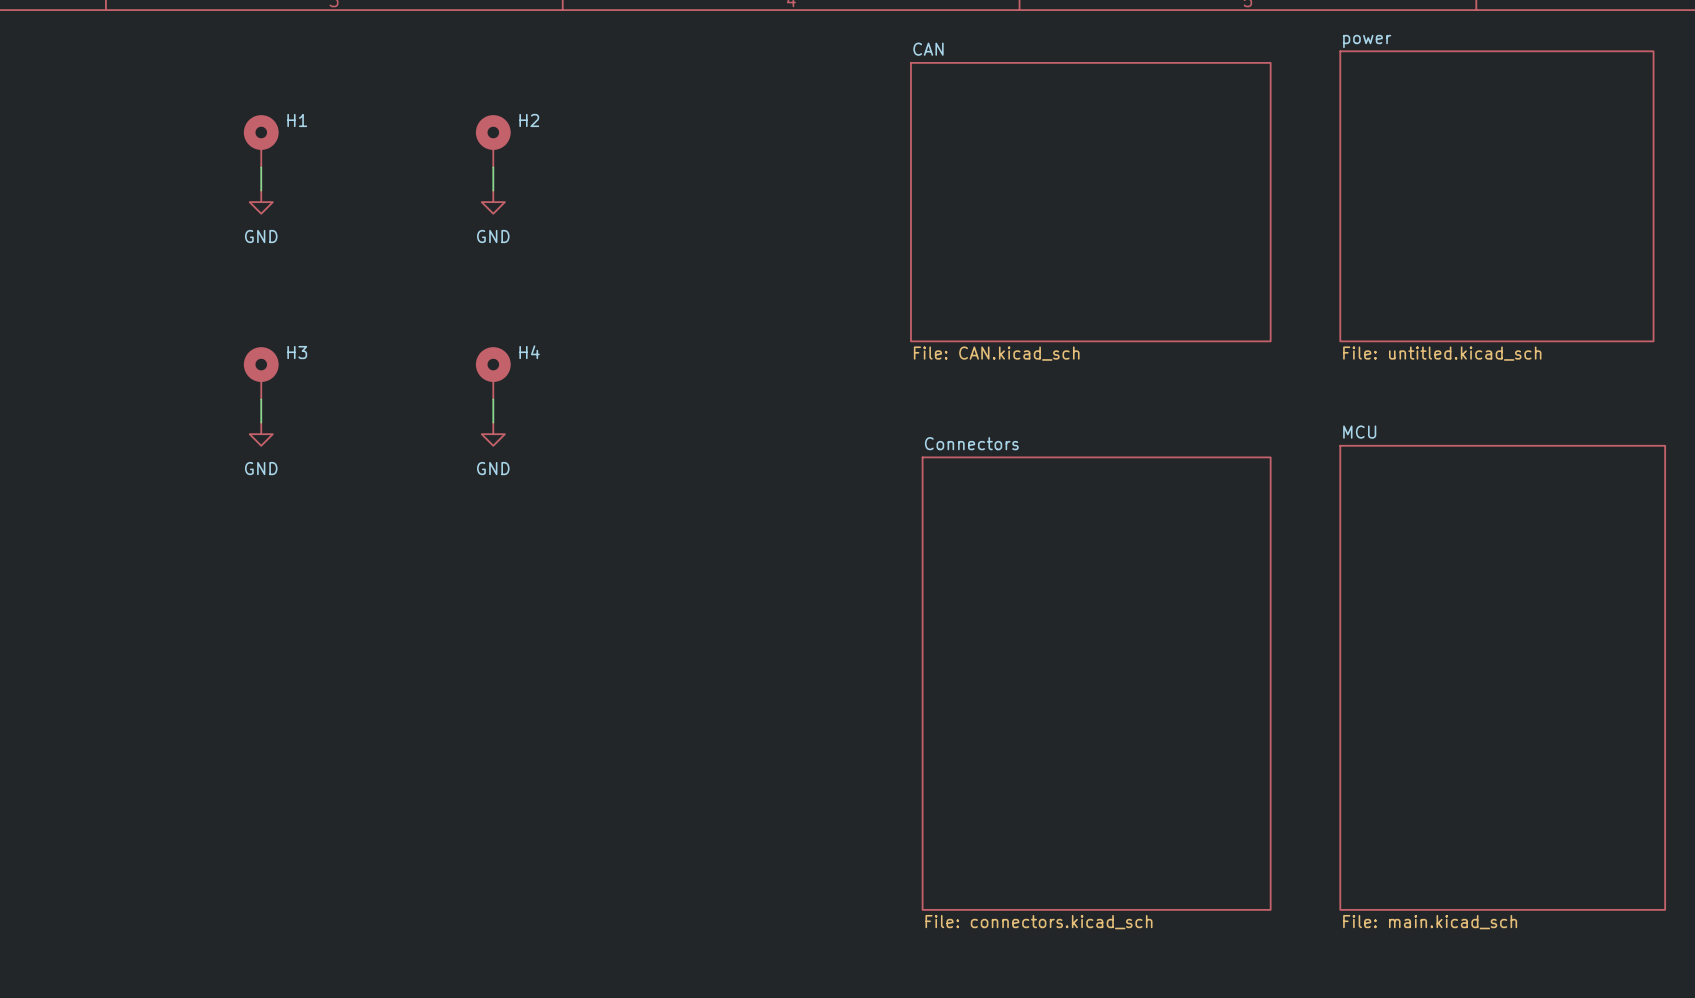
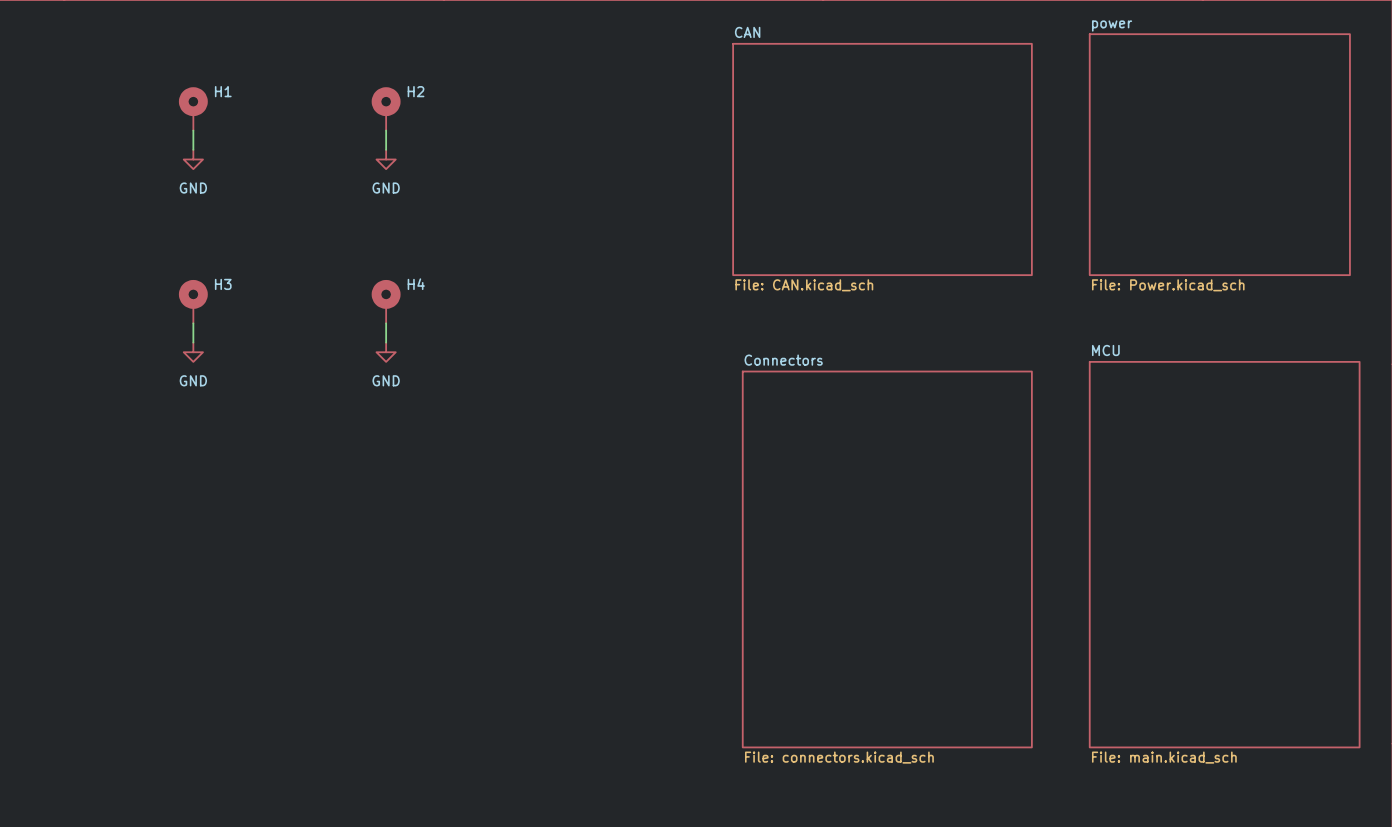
sheet power value: File: untitled.kicad_sch (1442, 353) -> File: Power.kicad_sch (1168, 285)

